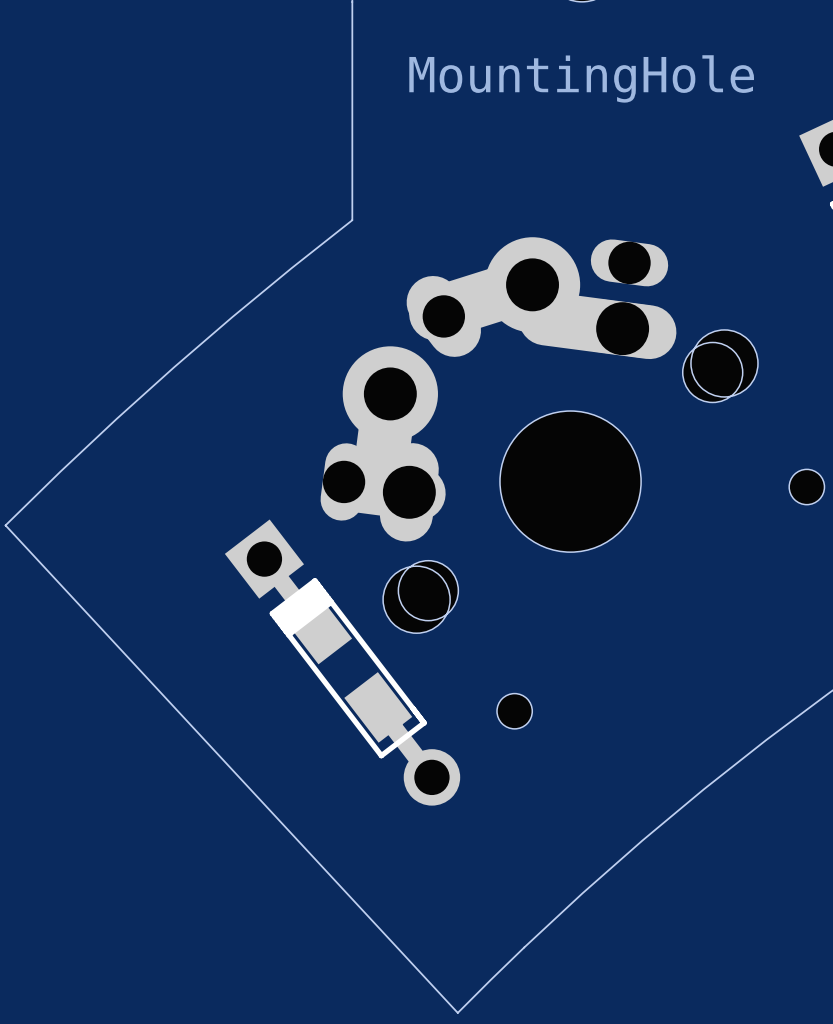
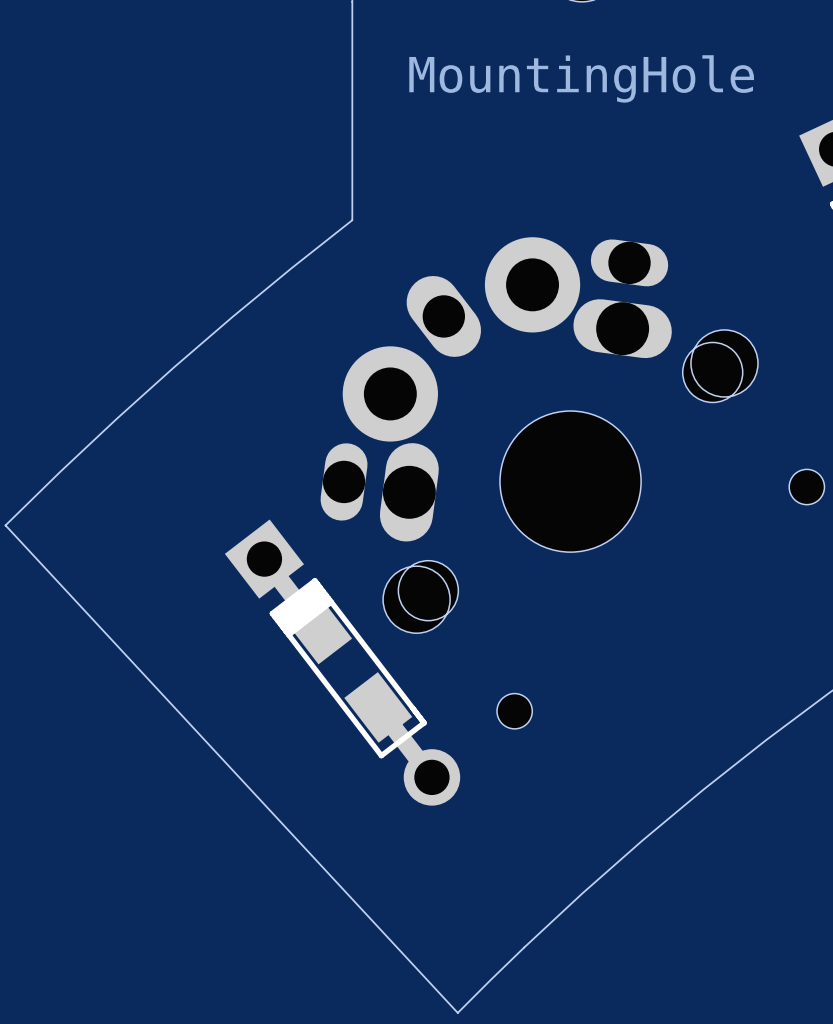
part footprint: [320, 237, 825, 729] -> [320, 237, 825, 729]

